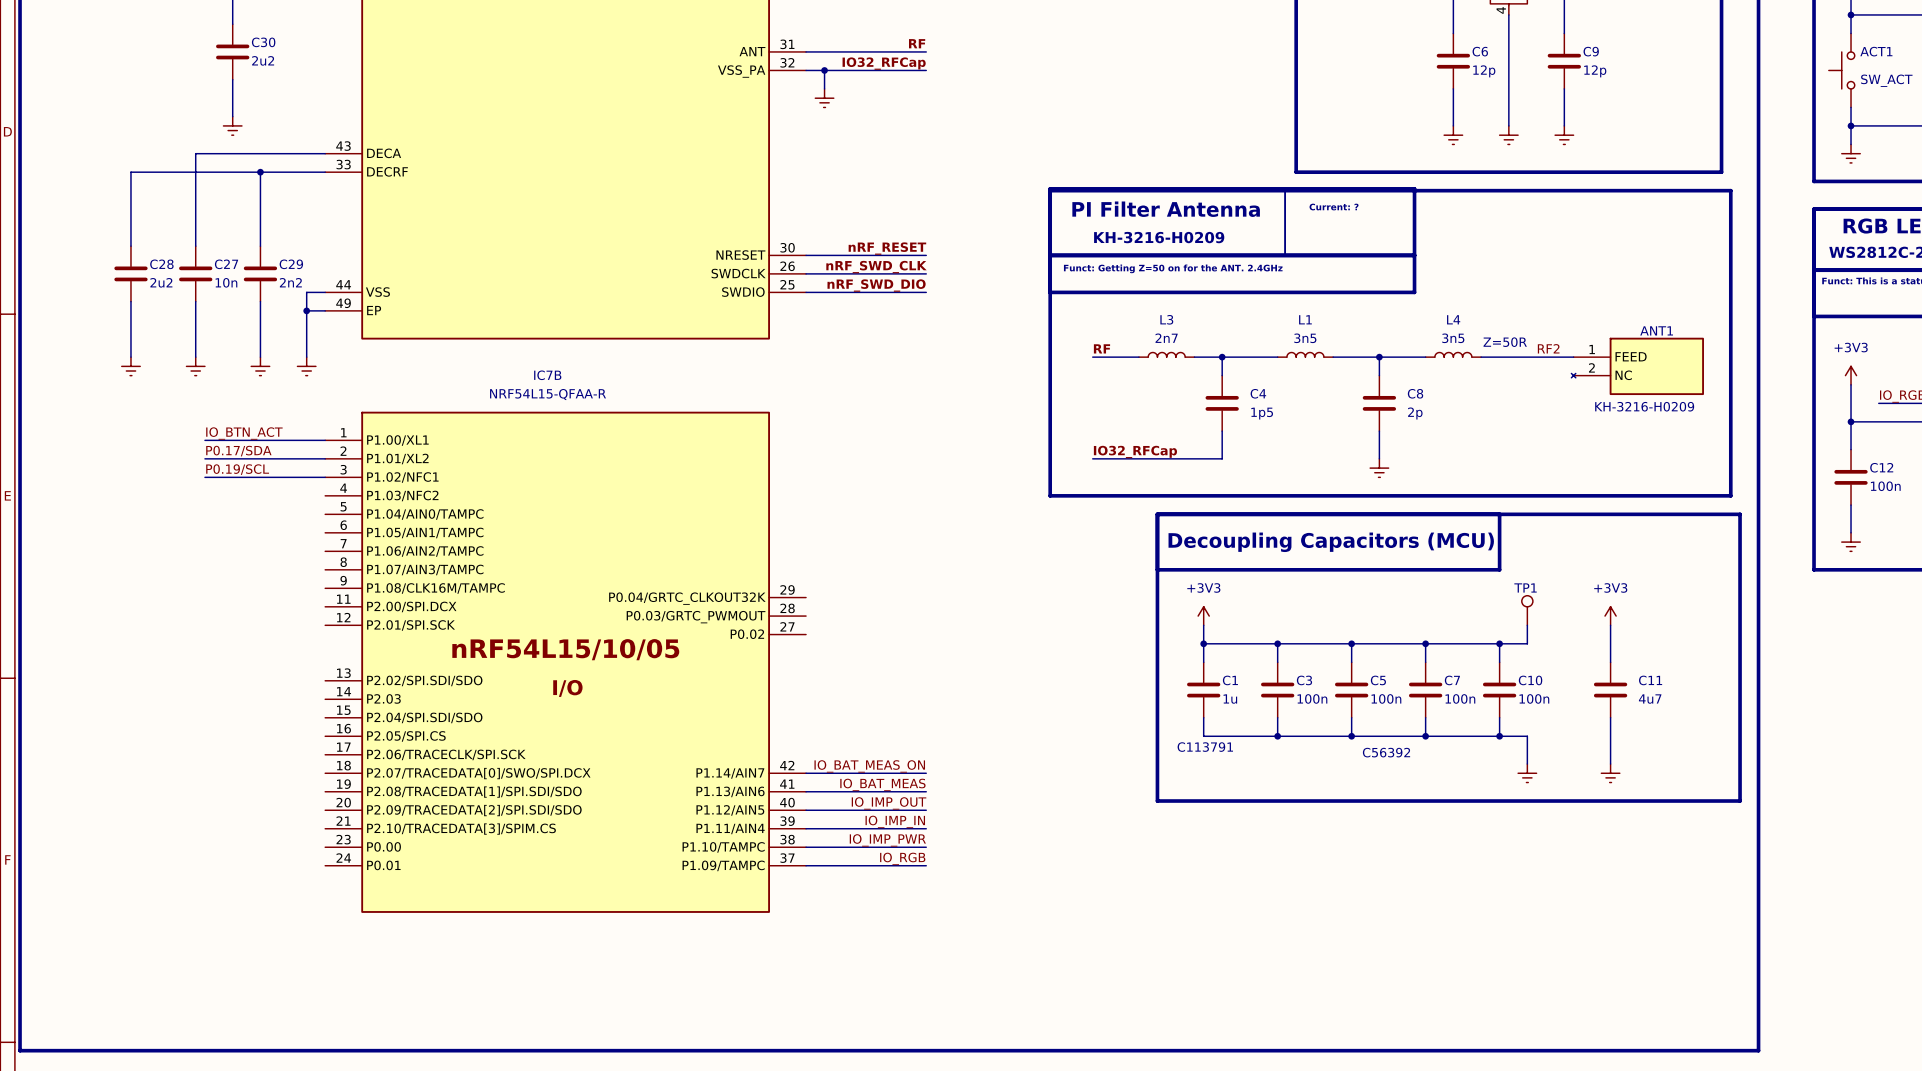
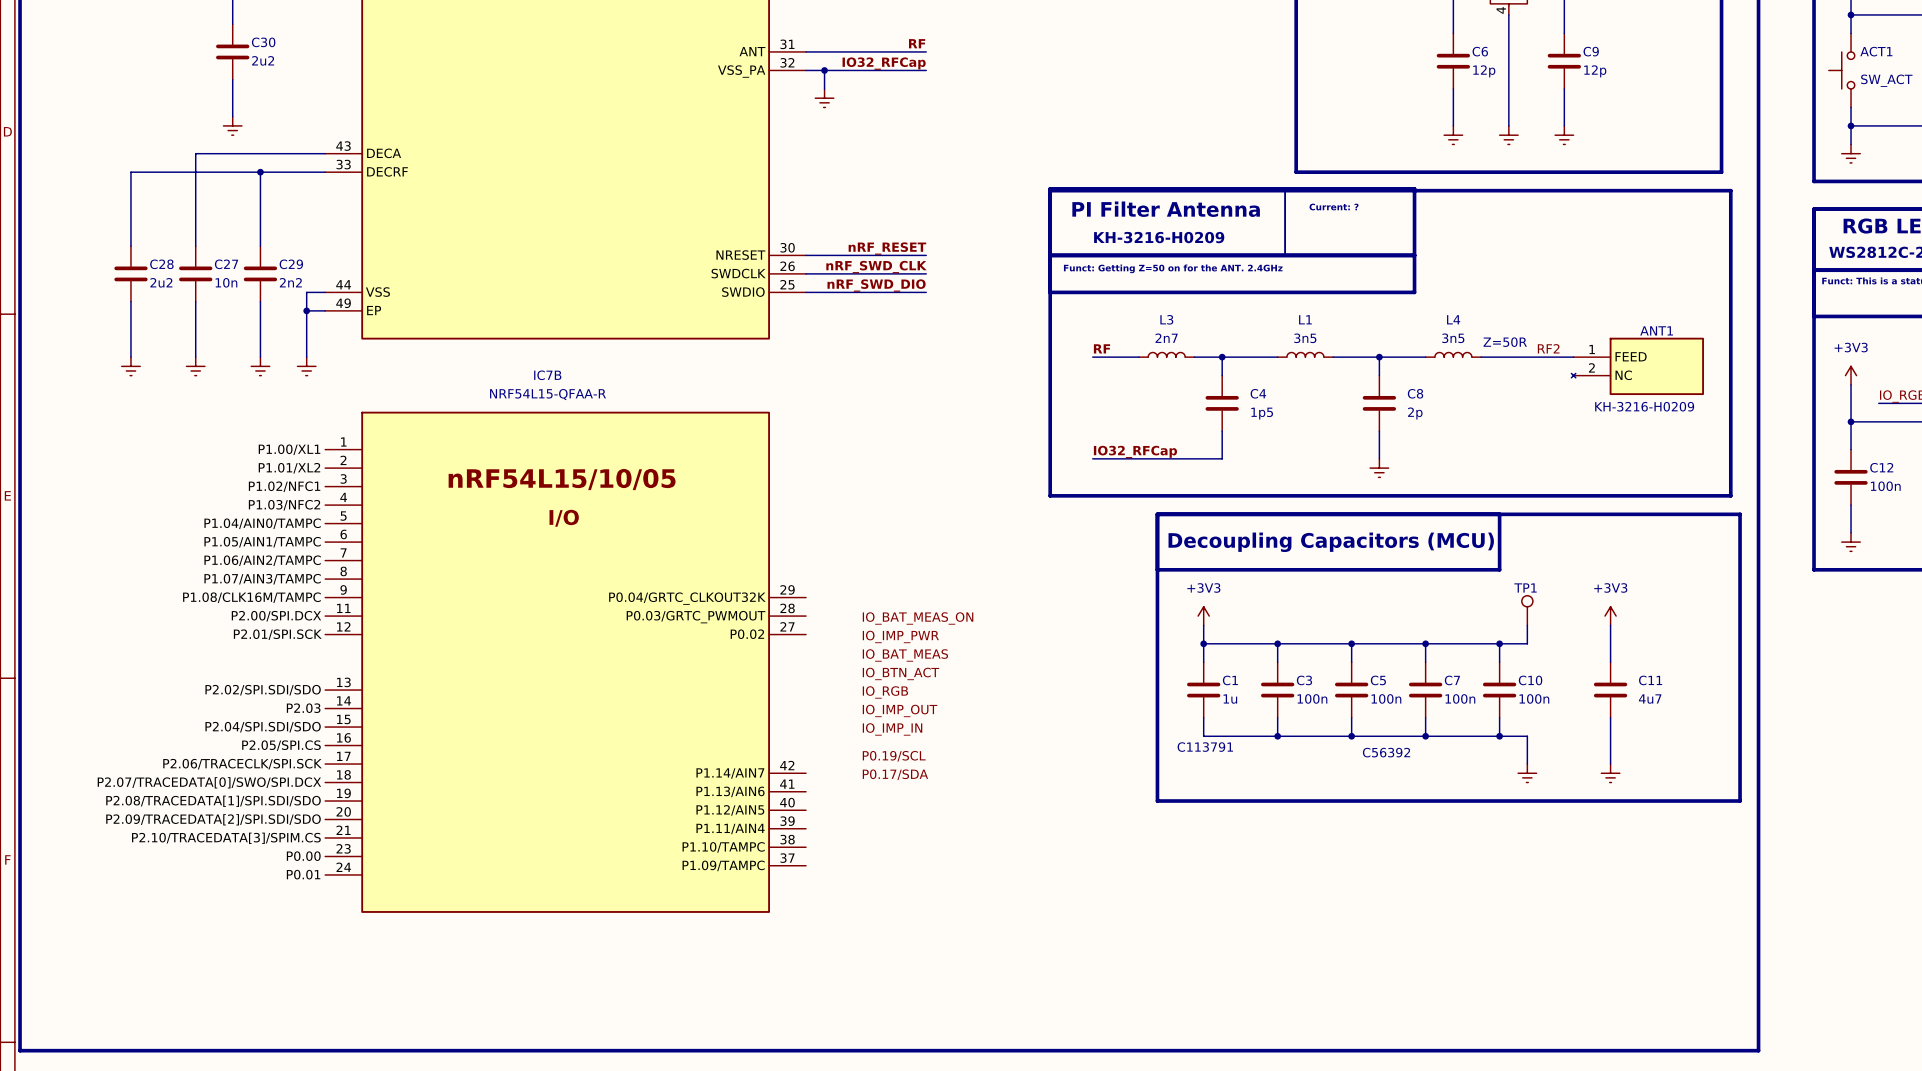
IC7B symbol: [325, 411, 807, 913] -> [325, 411, 807, 913]
label: IO_BTN_ACT (244, 433) -> none
wire: (204, 440) (325, 440) -> none
label: P0.17/SDA (238, 451) -> none
wire: (204, 458) (325, 458) -> none
label: P0.19/SCL (237, 469) -> none
wire: (204, 477) (325, 477) -> none
label: none -> IO_IMP_PWR (900, 636)
label: none -> IO_BTN_ACT (900, 673)
label: none -> P0.19/SCL (894, 756)
label position: IO_BAT_MEAS_ON (869, 766) -> IO_BAT_MEAS_ON (918, 618)
wire: (806, 773) (926, 773) -> none
label: none -> P0.17/SDA (895, 774)
label position: IO_BAT_MEAS (882, 784) -> IO_BAT_MEAS (905, 655)
wire: (806, 791) (926, 791) -> none
label position: IO_IMP_OUT (889, 803) -> IO_IMP_OUT (900, 710)
wire: (806, 810) (926, 810) -> none
label position: IO_IMP_IN (895, 821) -> IO_IMP_IN (892, 729)
wire: (806, 828) (926, 828) -> none
label: IO_IMP_PWR (887, 840) -> none
wire: (806, 847) (926, 847) -> none
label position: IO_RGB (902, 858) -> IO_RGB (885, 692)
wire: (806, 865) (926, 865) -> none

